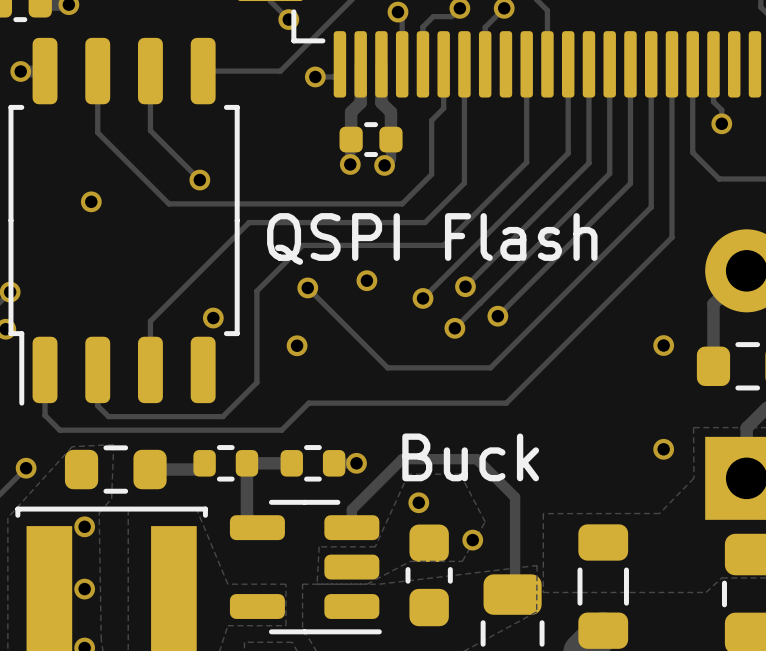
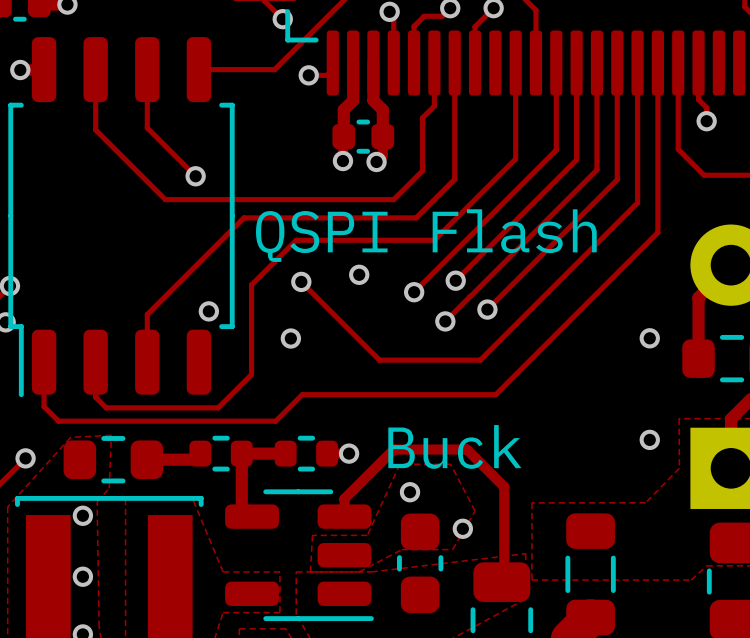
via: (91, 201) -> none

